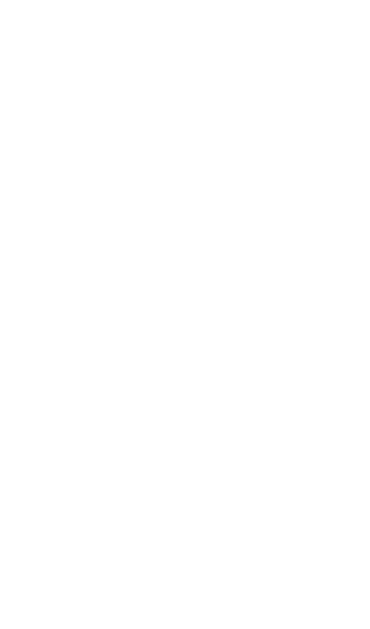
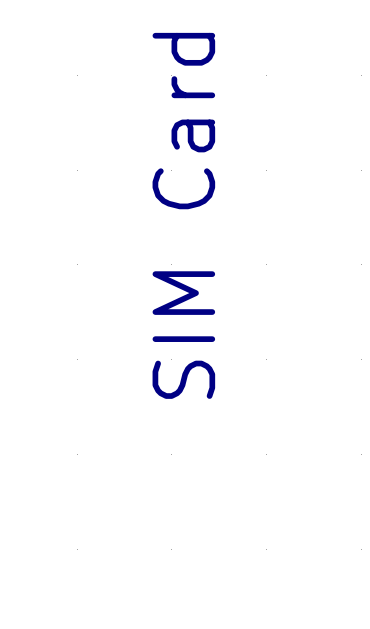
text: none -> SIM Card (183, 215)

